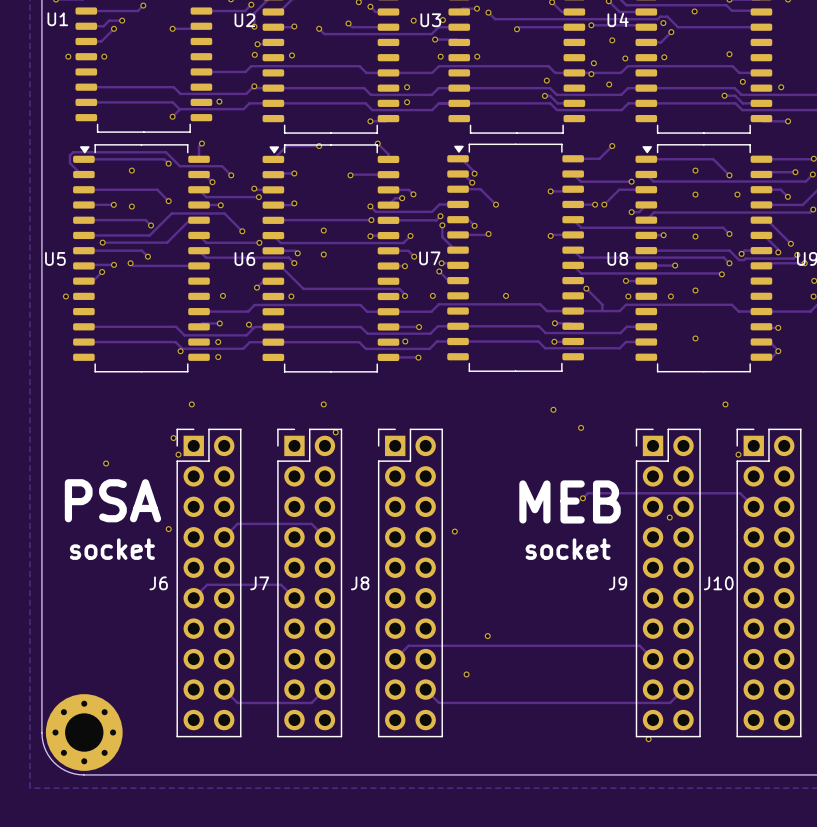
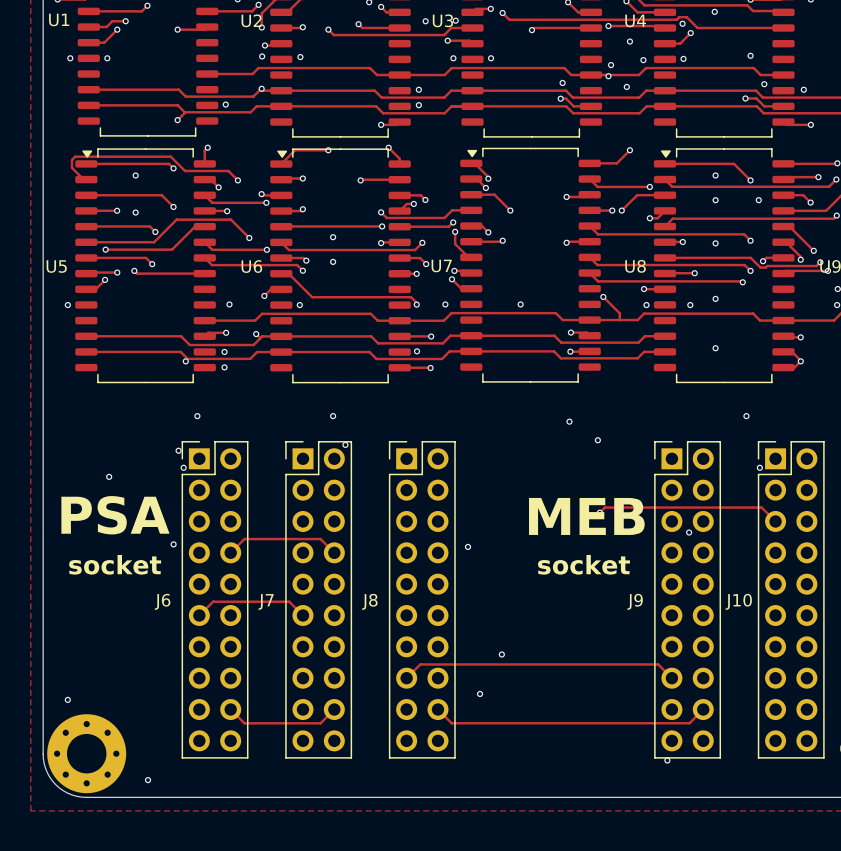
via: none -> (67, 699)
via: none -> (148, 780)

